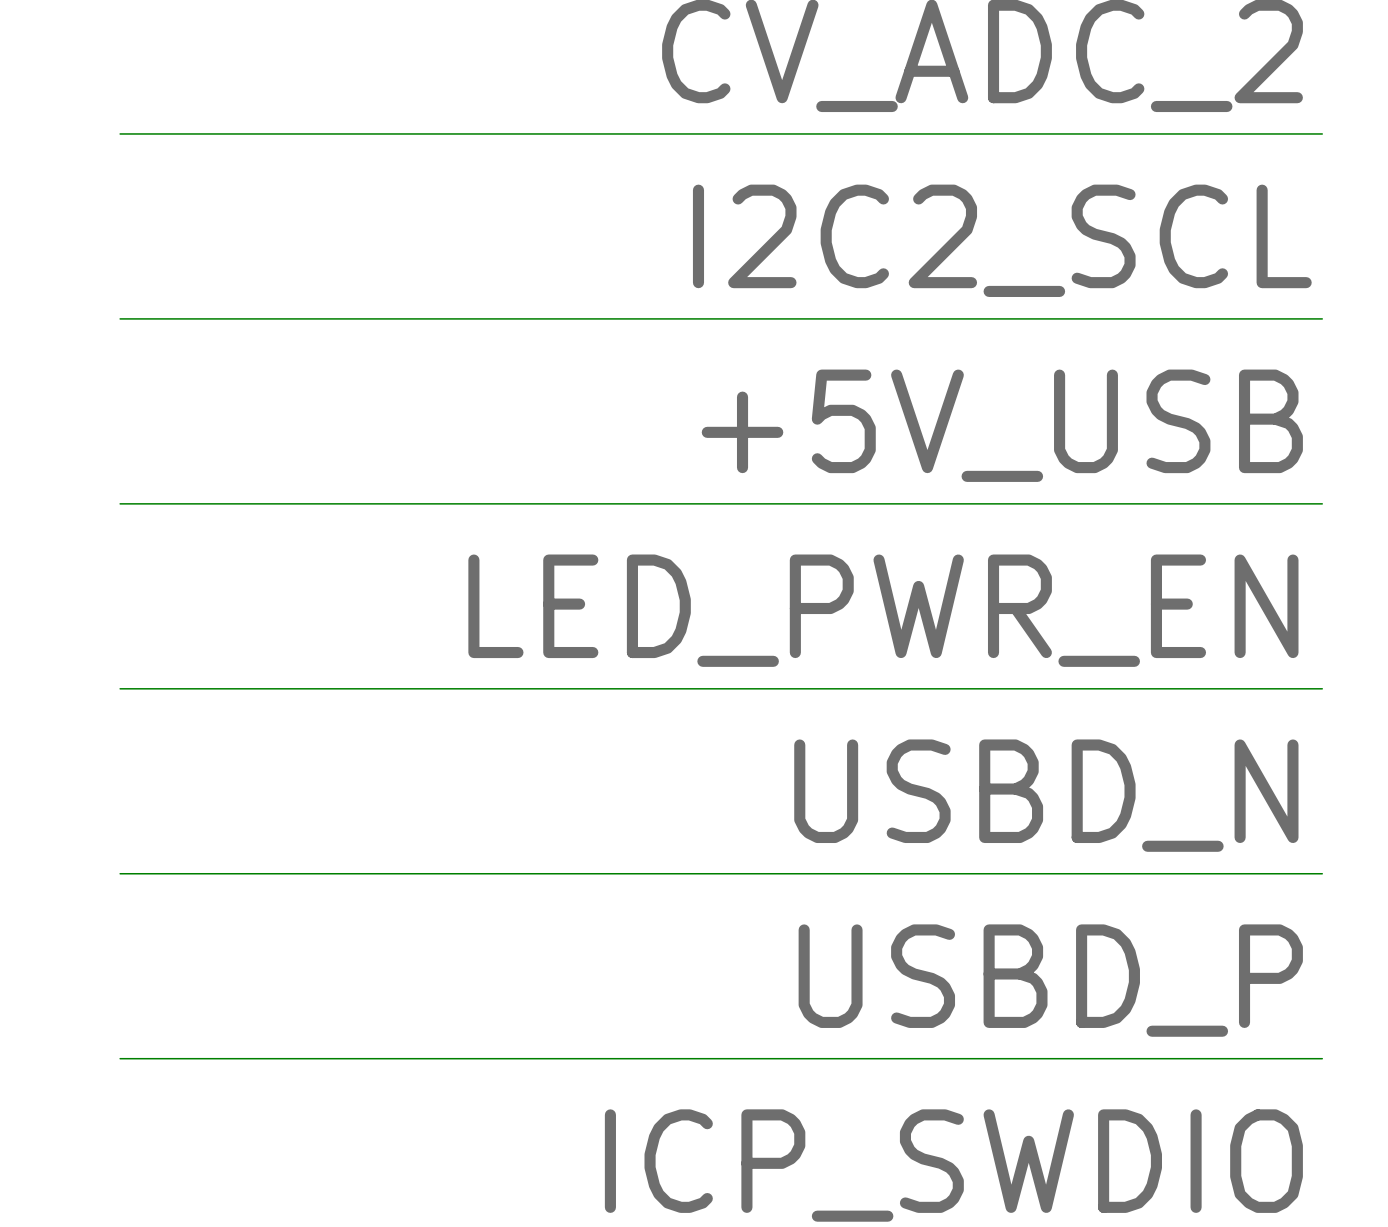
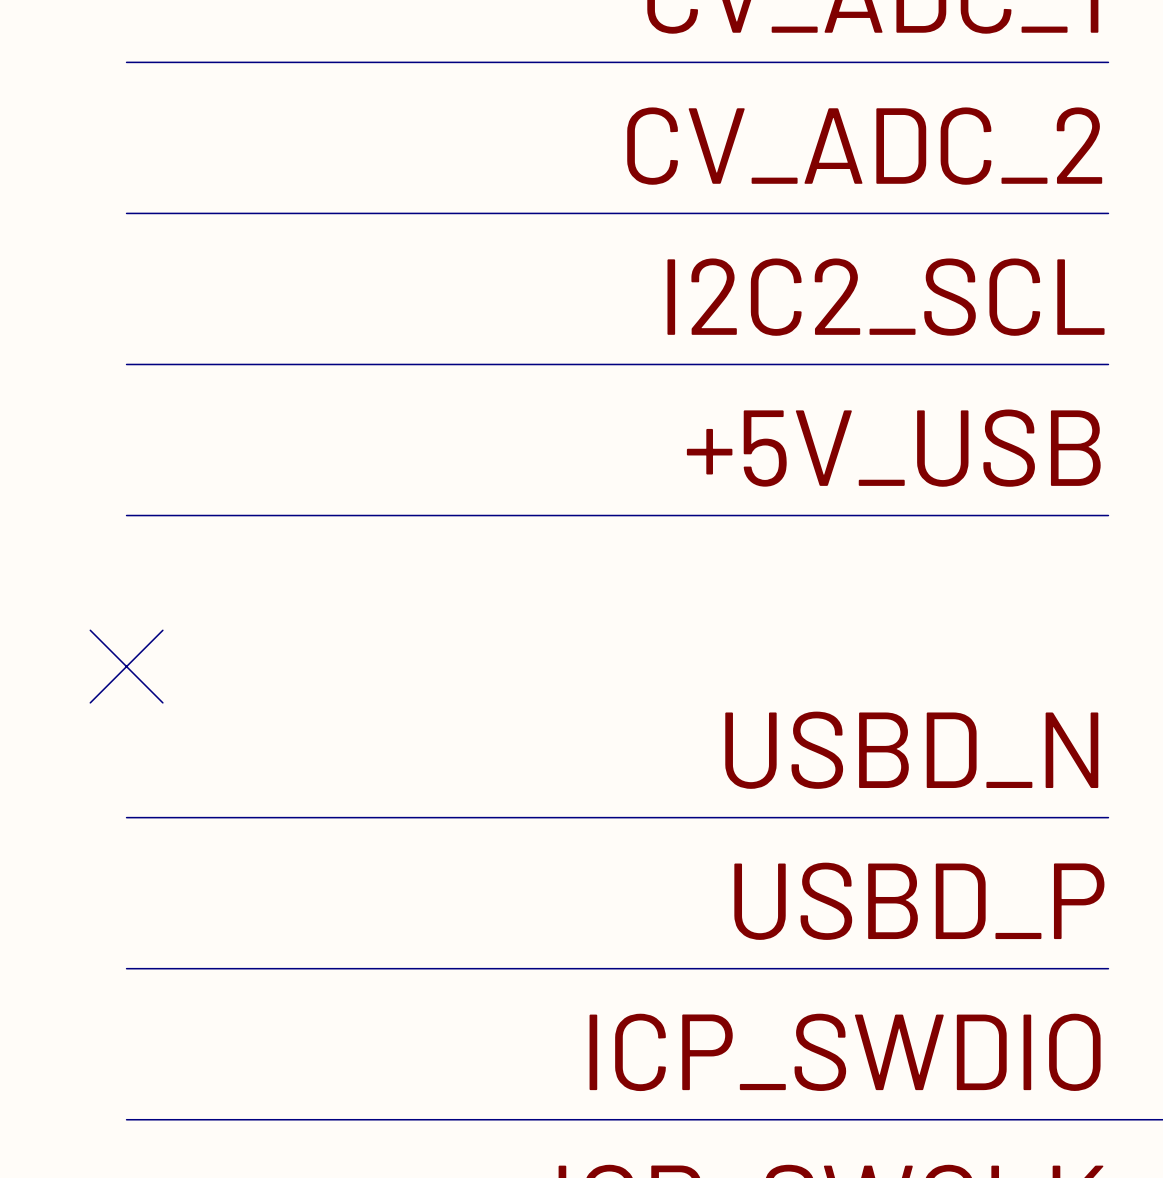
label: LED_PWR_EN (883, 610) -> none
wire: (120, 688) (1322, 688) -> none
no-connect mark: none -> (126, 666)

